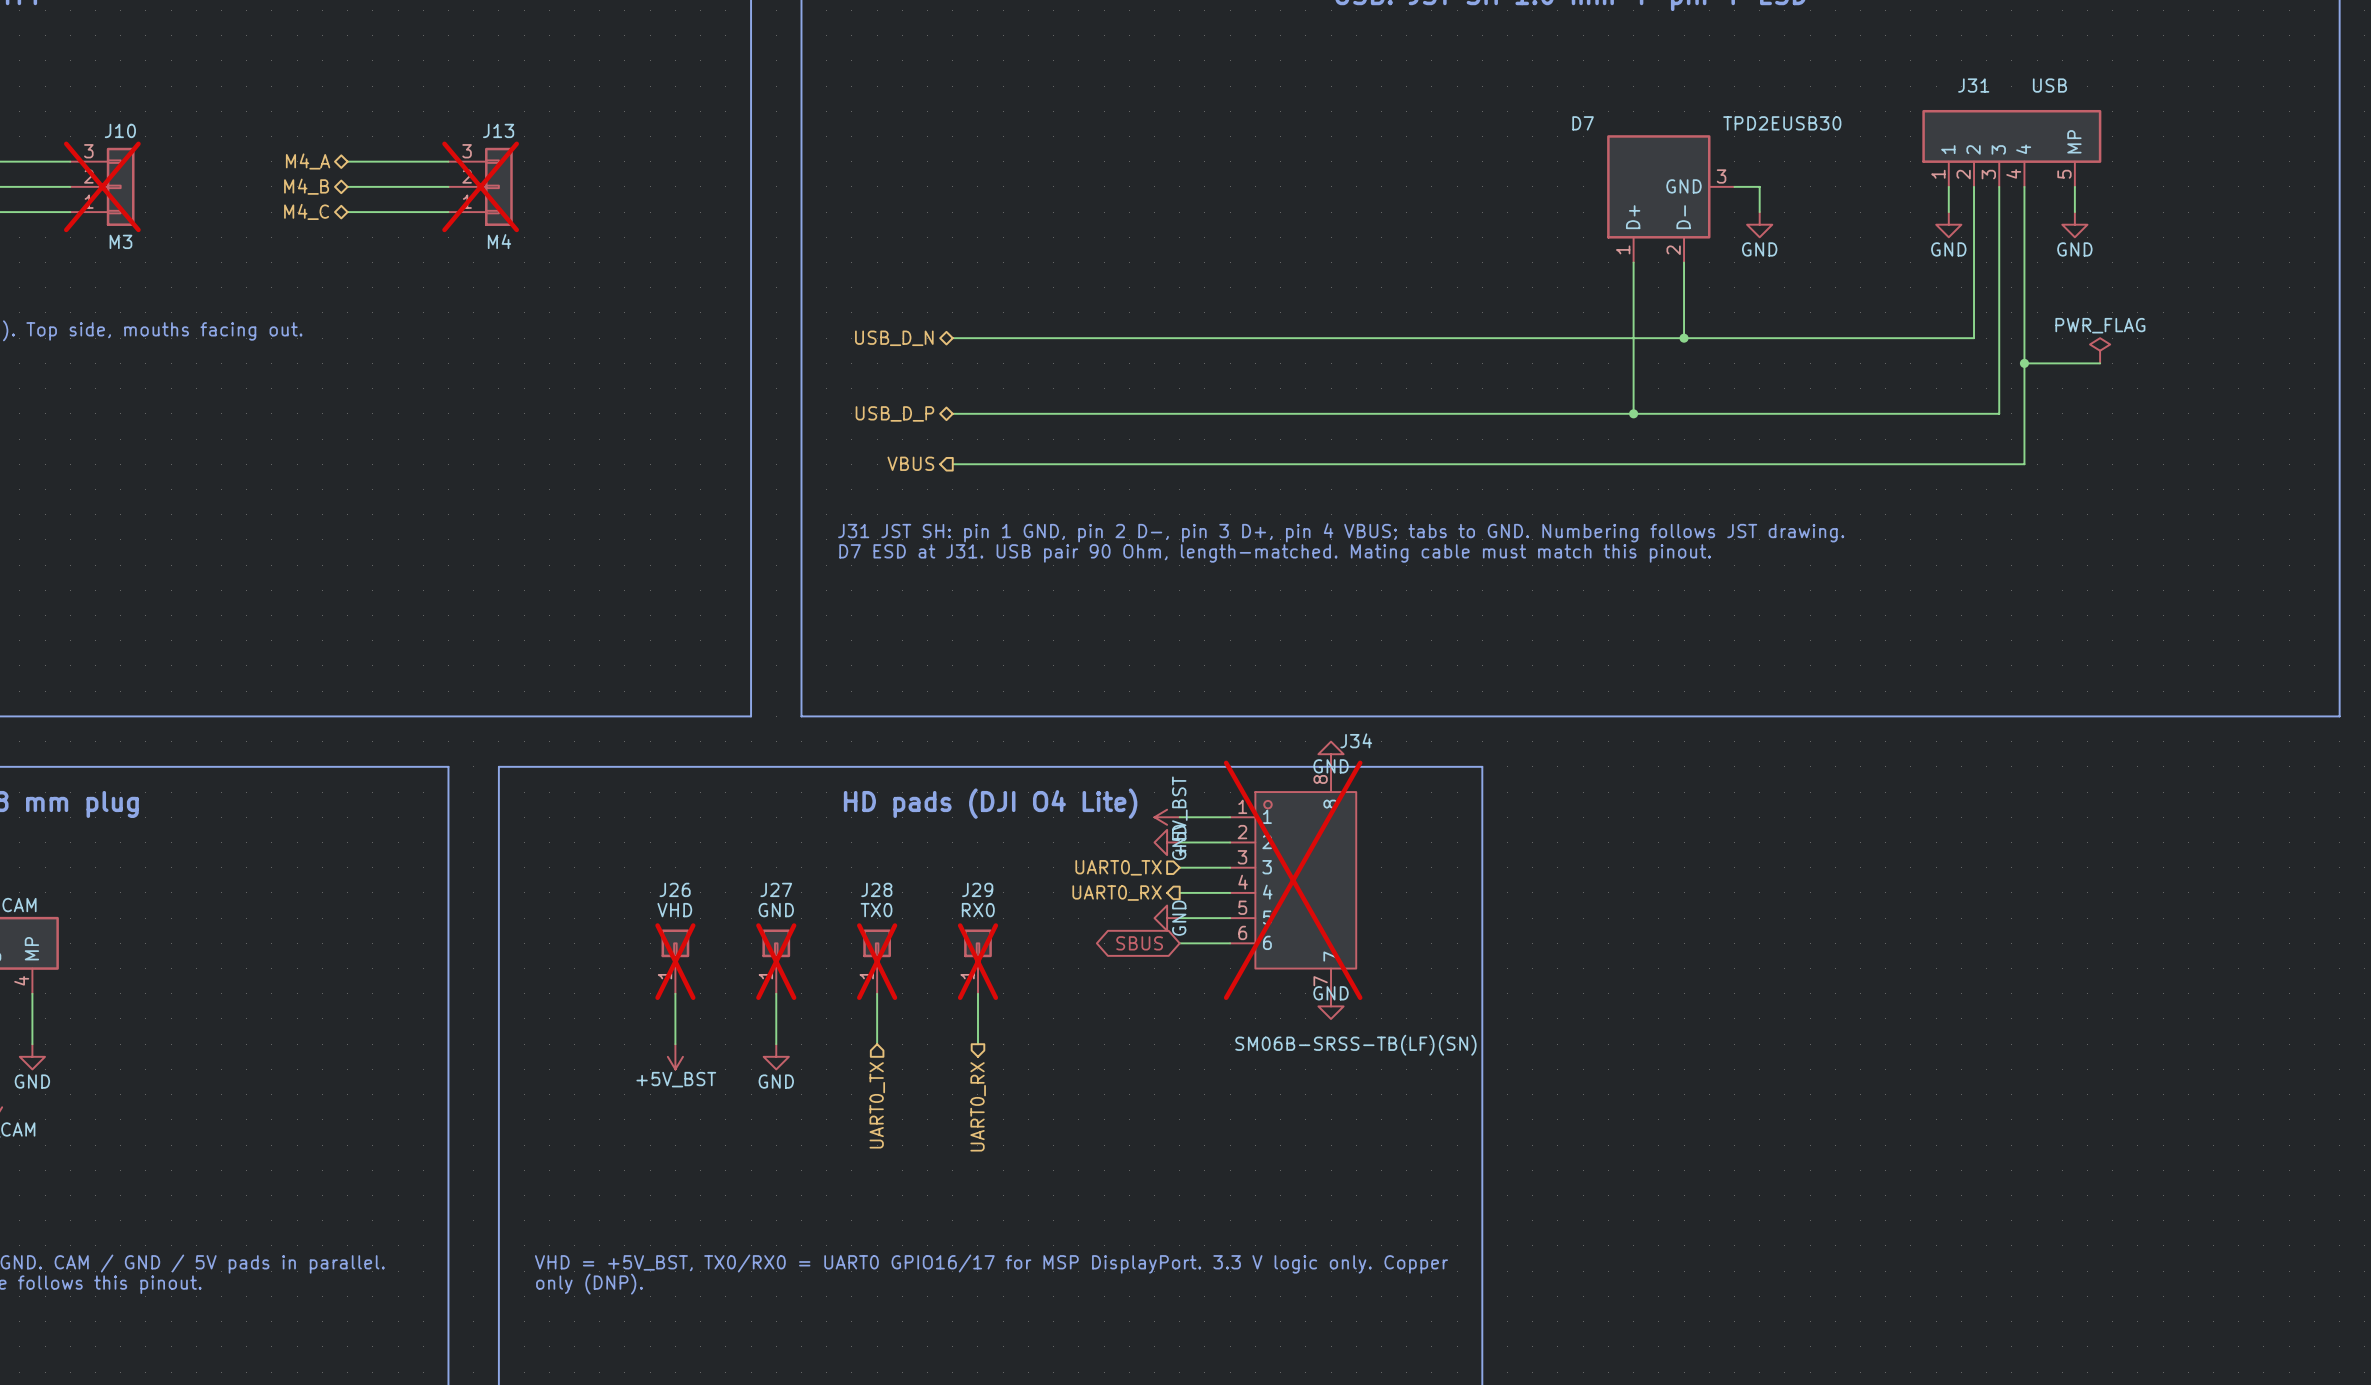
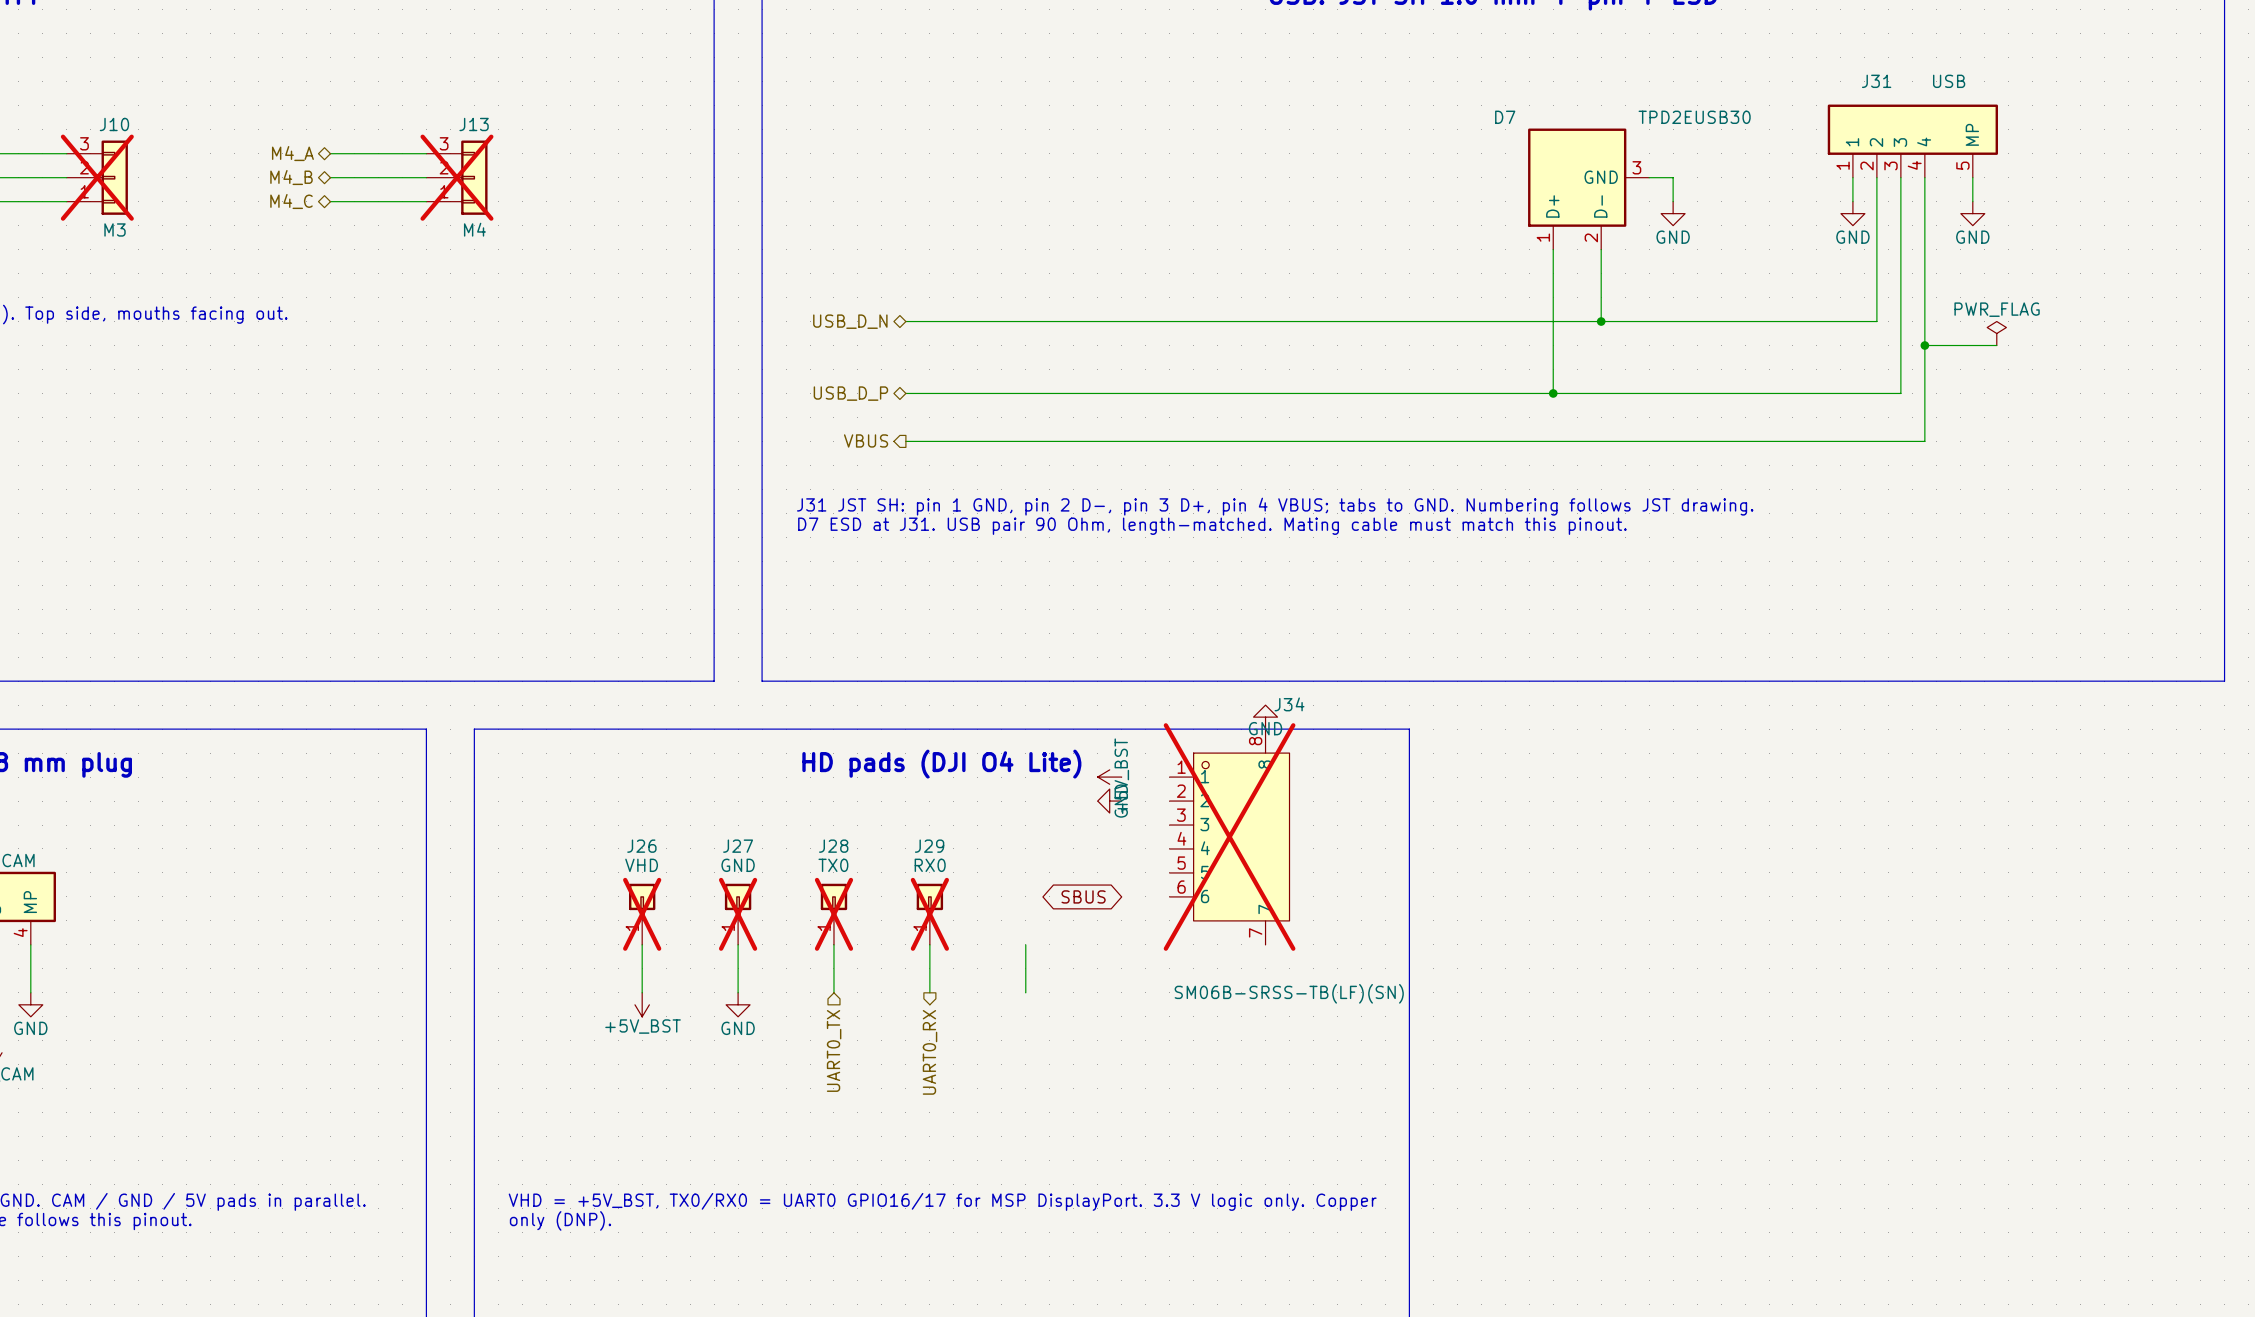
wire: (1179, 817) (1230, 817) -> none
wire: (1179, 842) (1230, 842) -> none
hierarchical label: UART0_TX (1118, 867) -> none
wire: (1179, 867) (1230, 867) -> none
wire: (1179, 892) (1230, 892) -> none
hierarchical label: UART0_RX (1117, 893) -> none
power symbol: GND (1167, 918) -> none
wire: (1179, 918) (1230, 918) -> none
wire: (1179, 943) (1230, 943) -> none
wire: none -> (1025, 944) (1025, 992)
power symbol: GND (1331, 1006) -> none

